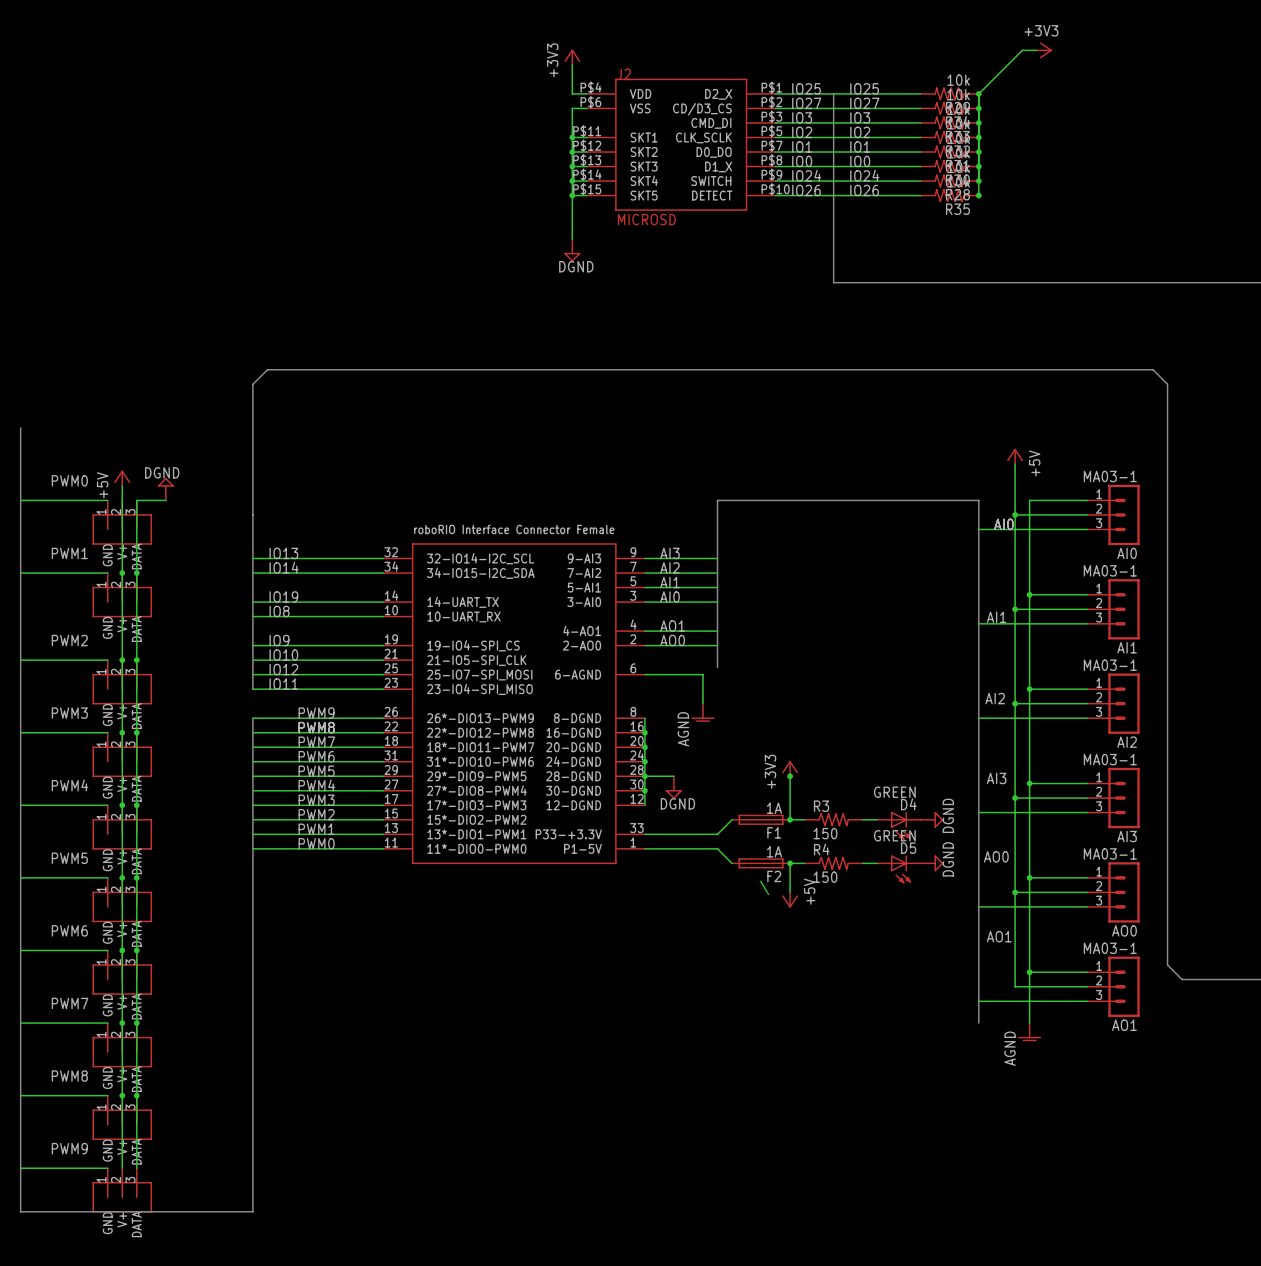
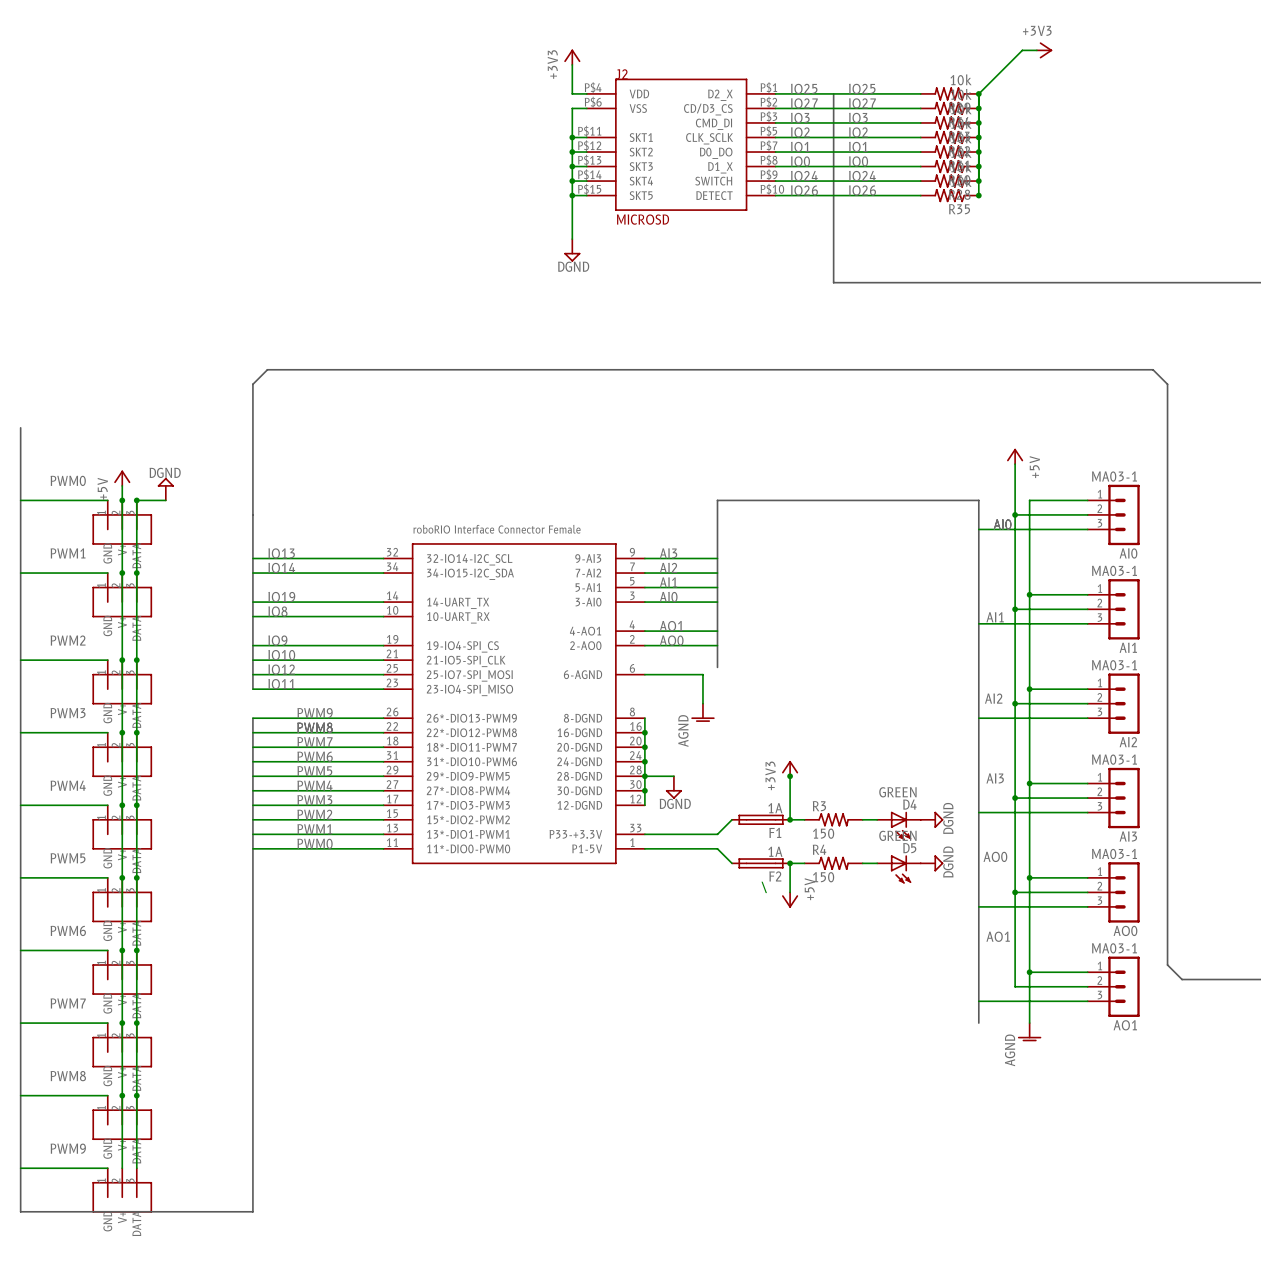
junction: none -> (122, 500)
junction: none -> (136, 500)

